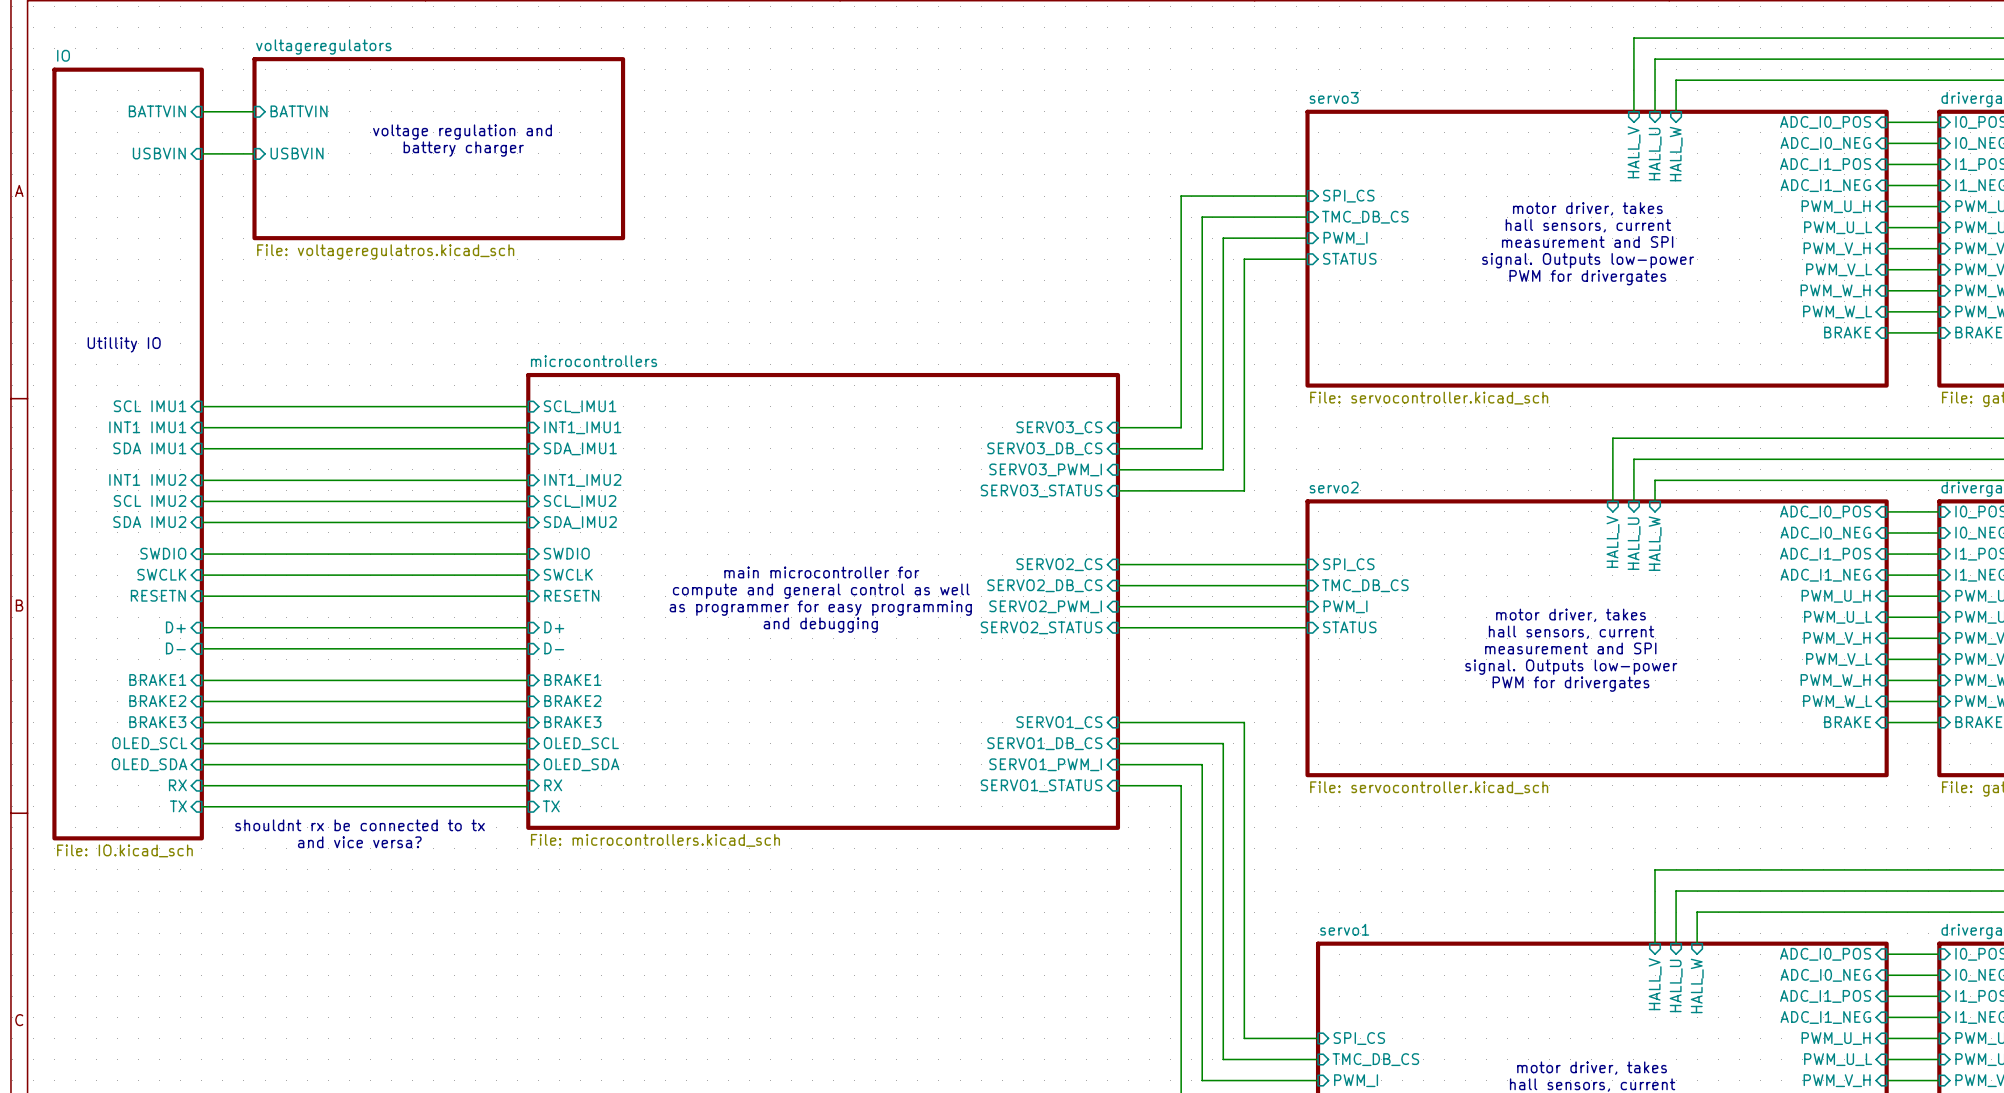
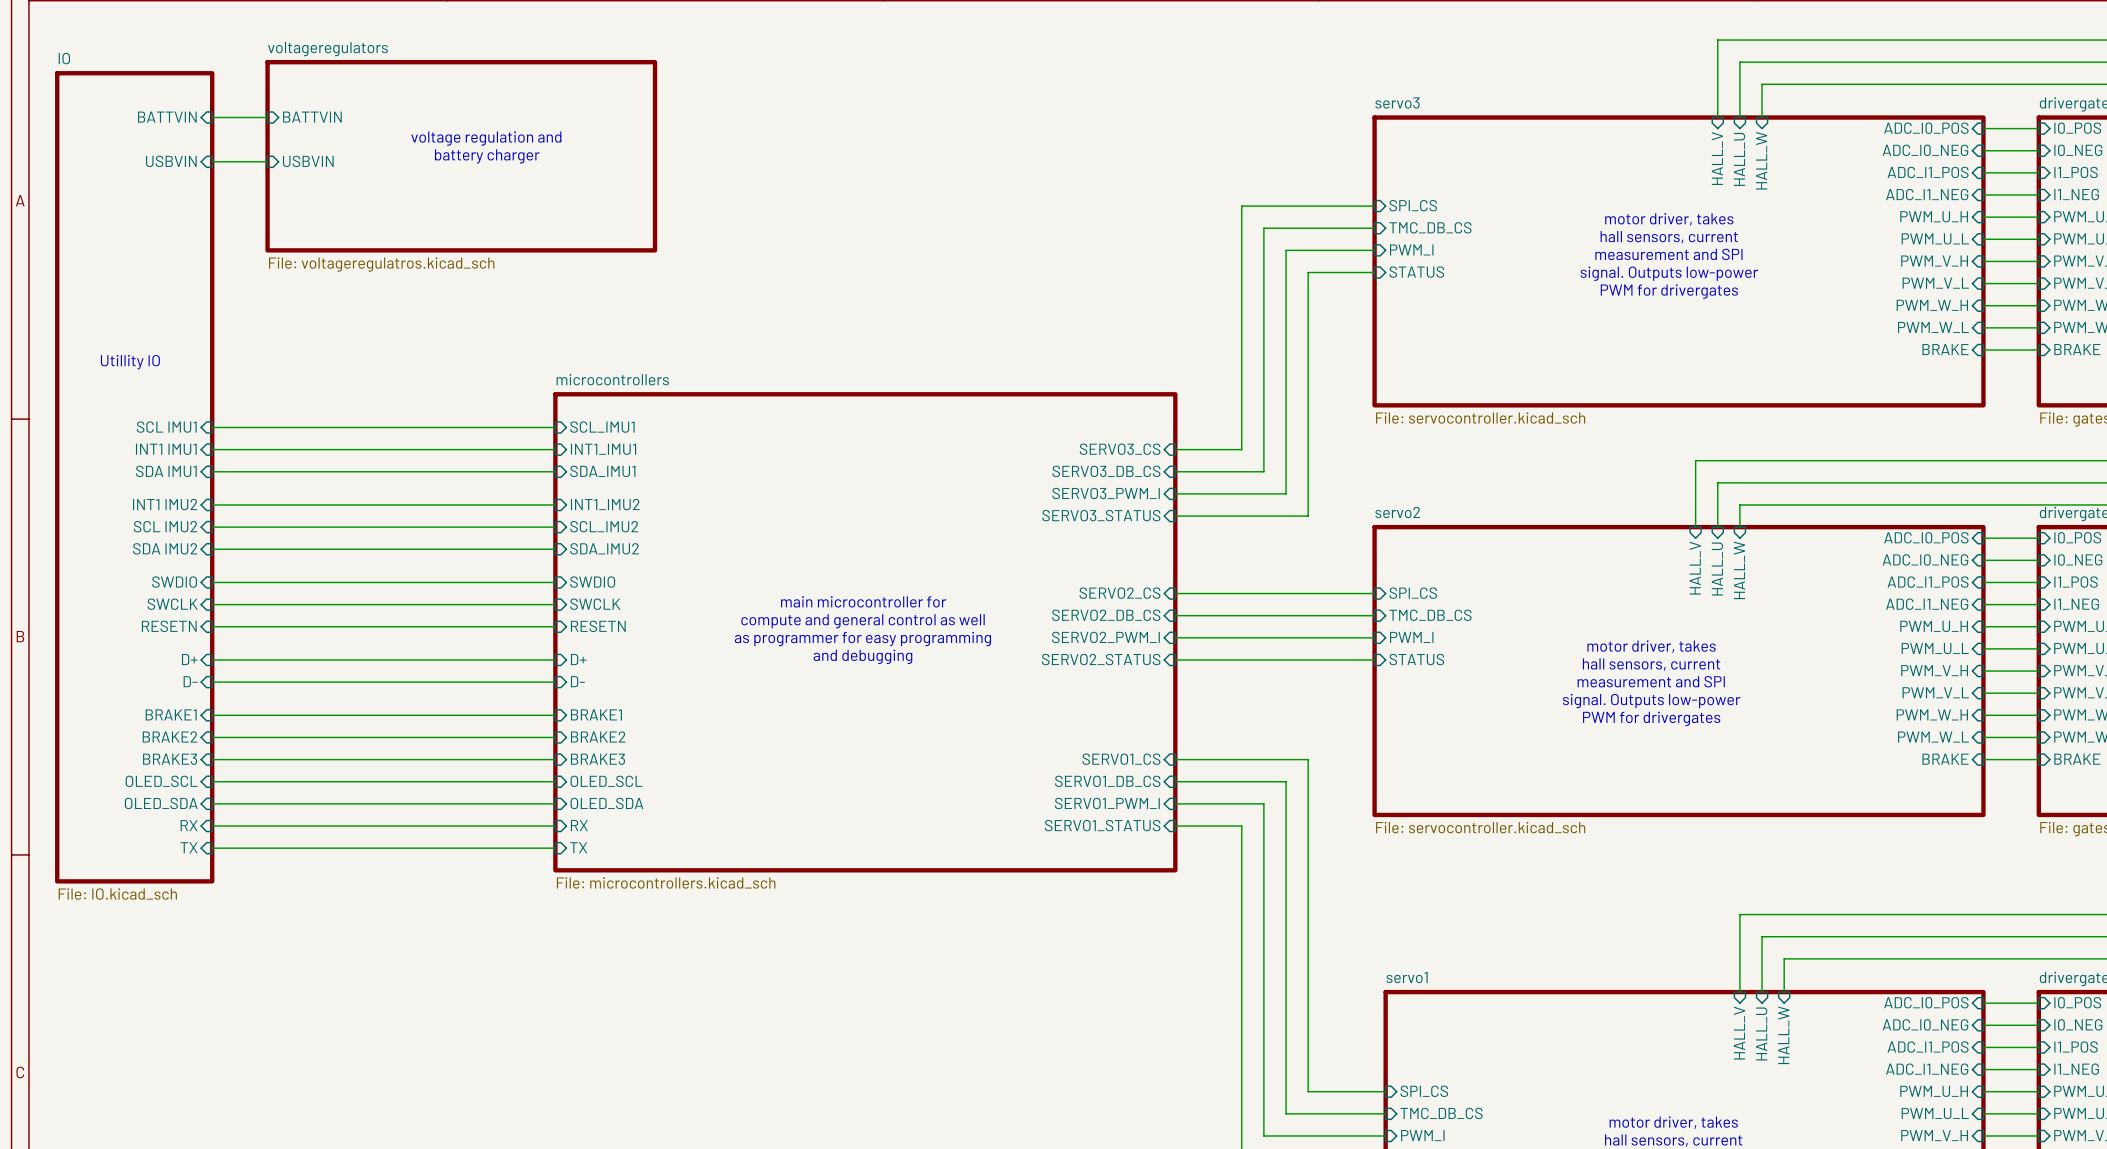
text: shouldnt rx be connected to tx (360, 825) -> none
text: and vice versa? (359, 842) -> none

